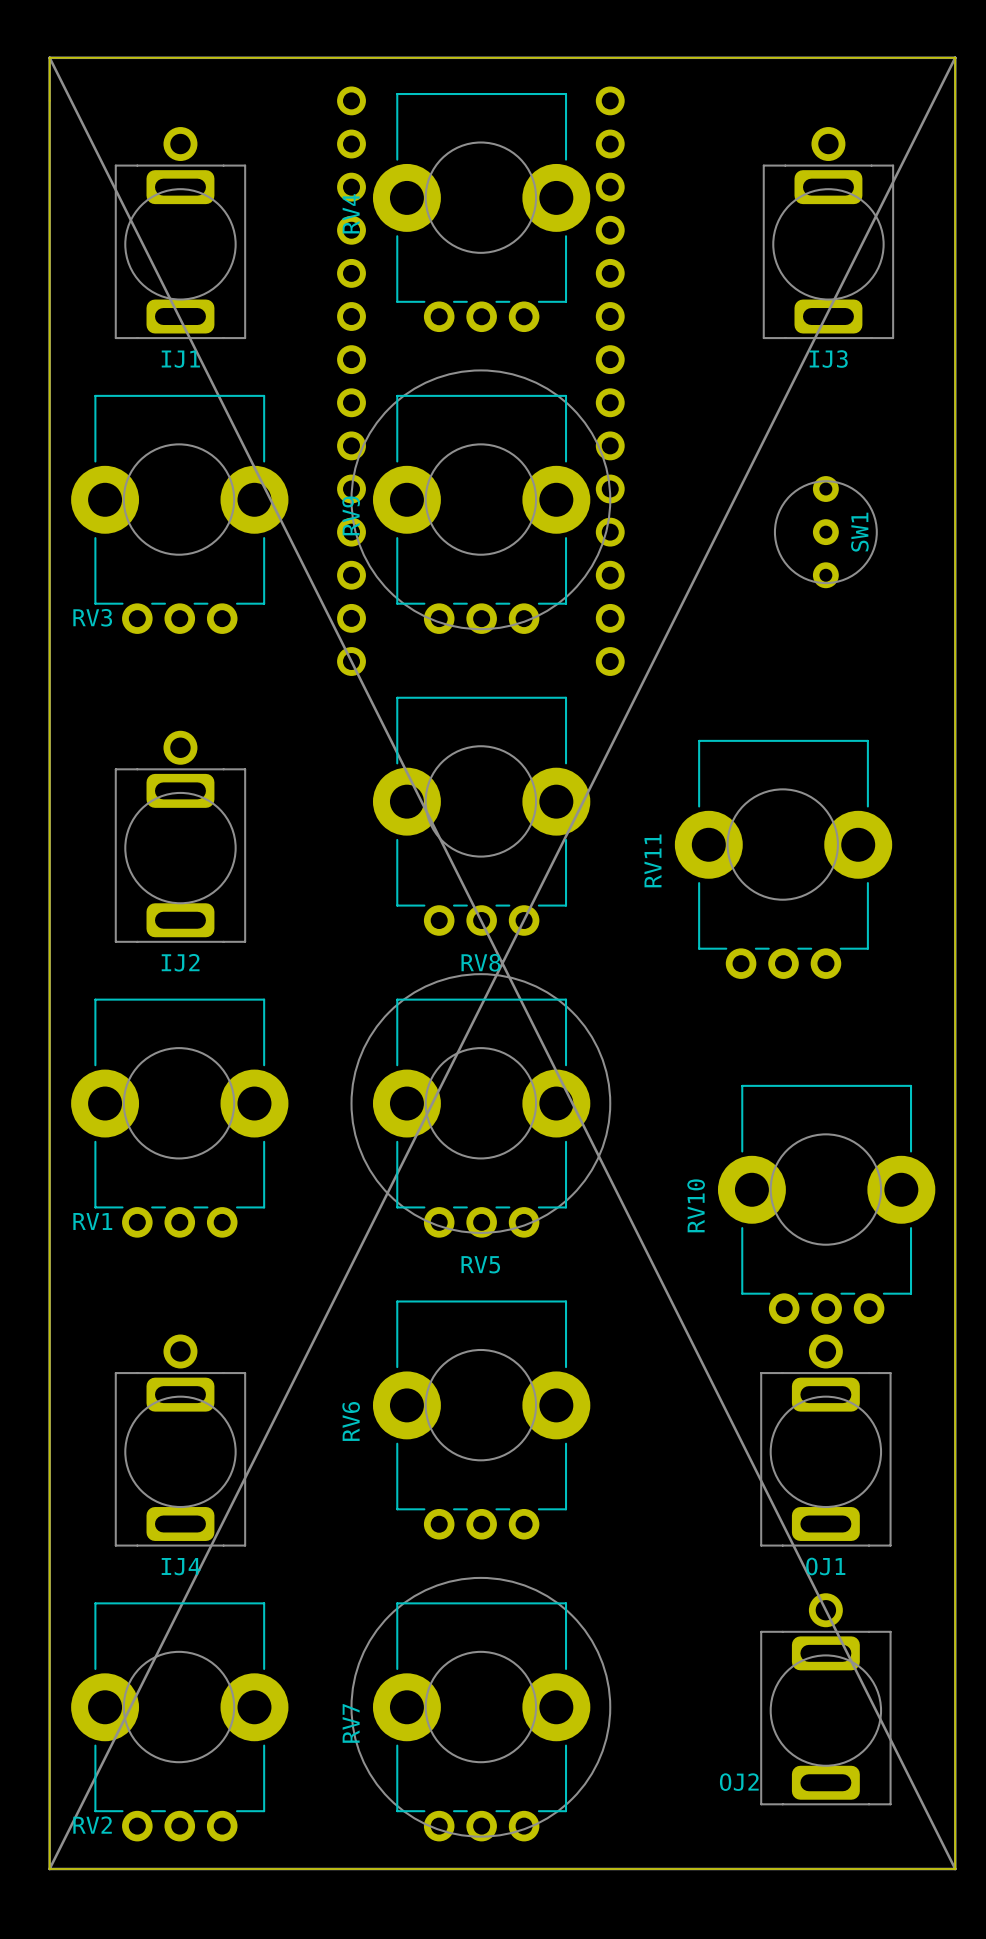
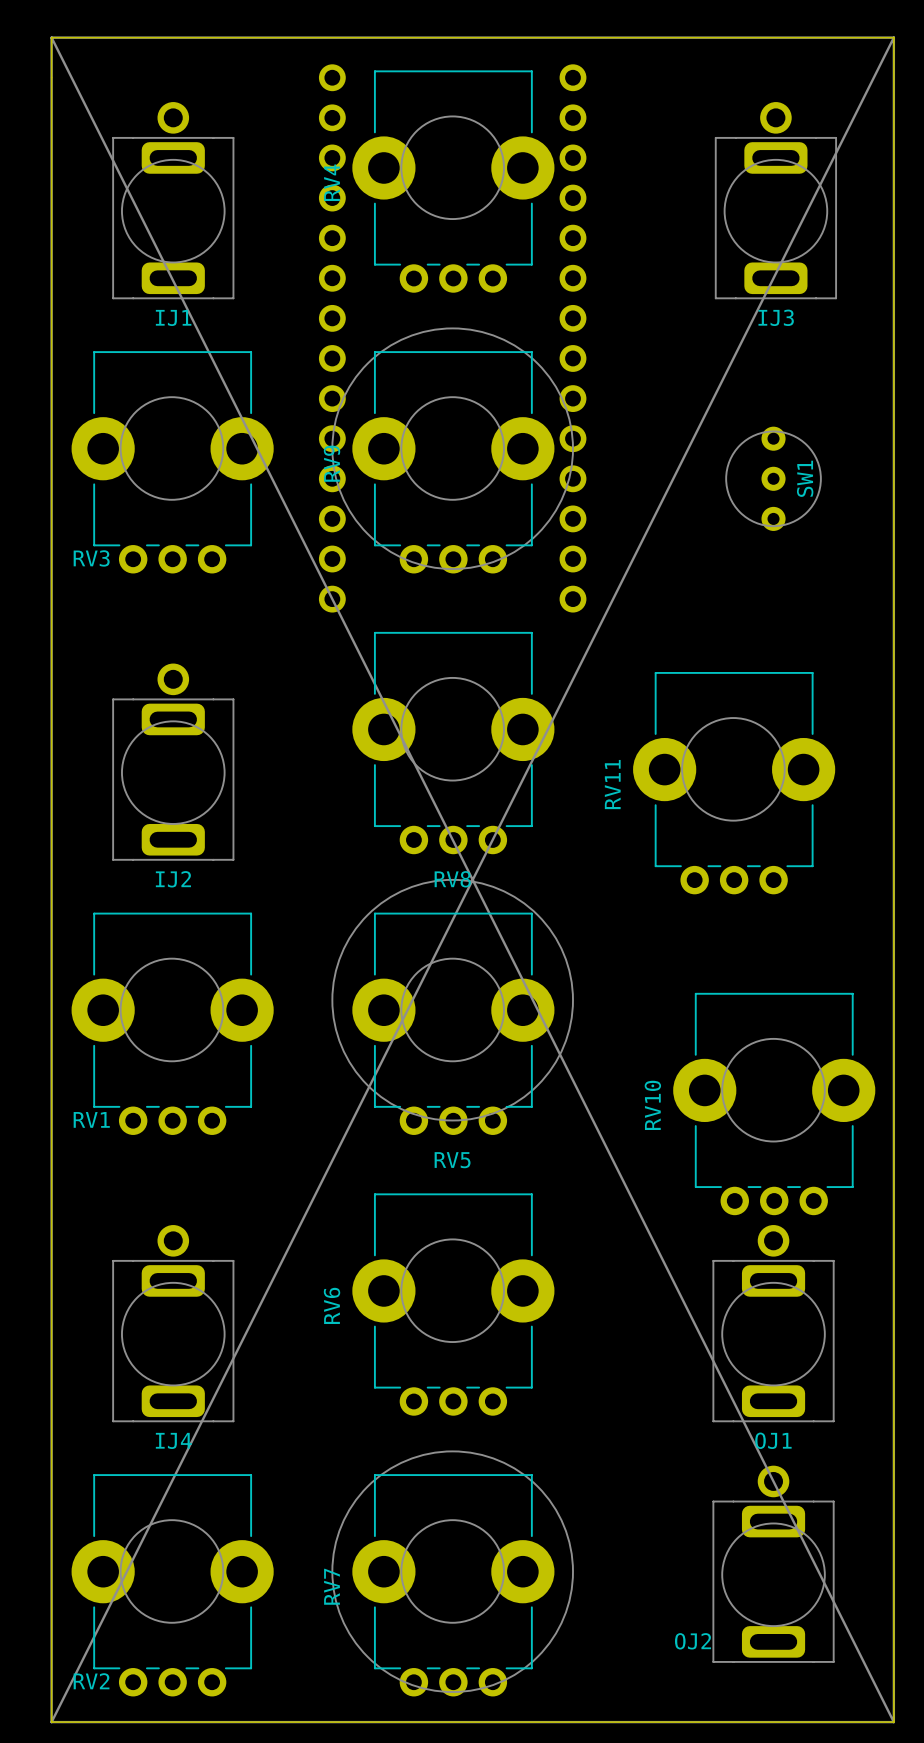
RV5 footprint: [350, 973, 612, 1238] -> [331, 878, 574, 1135]

